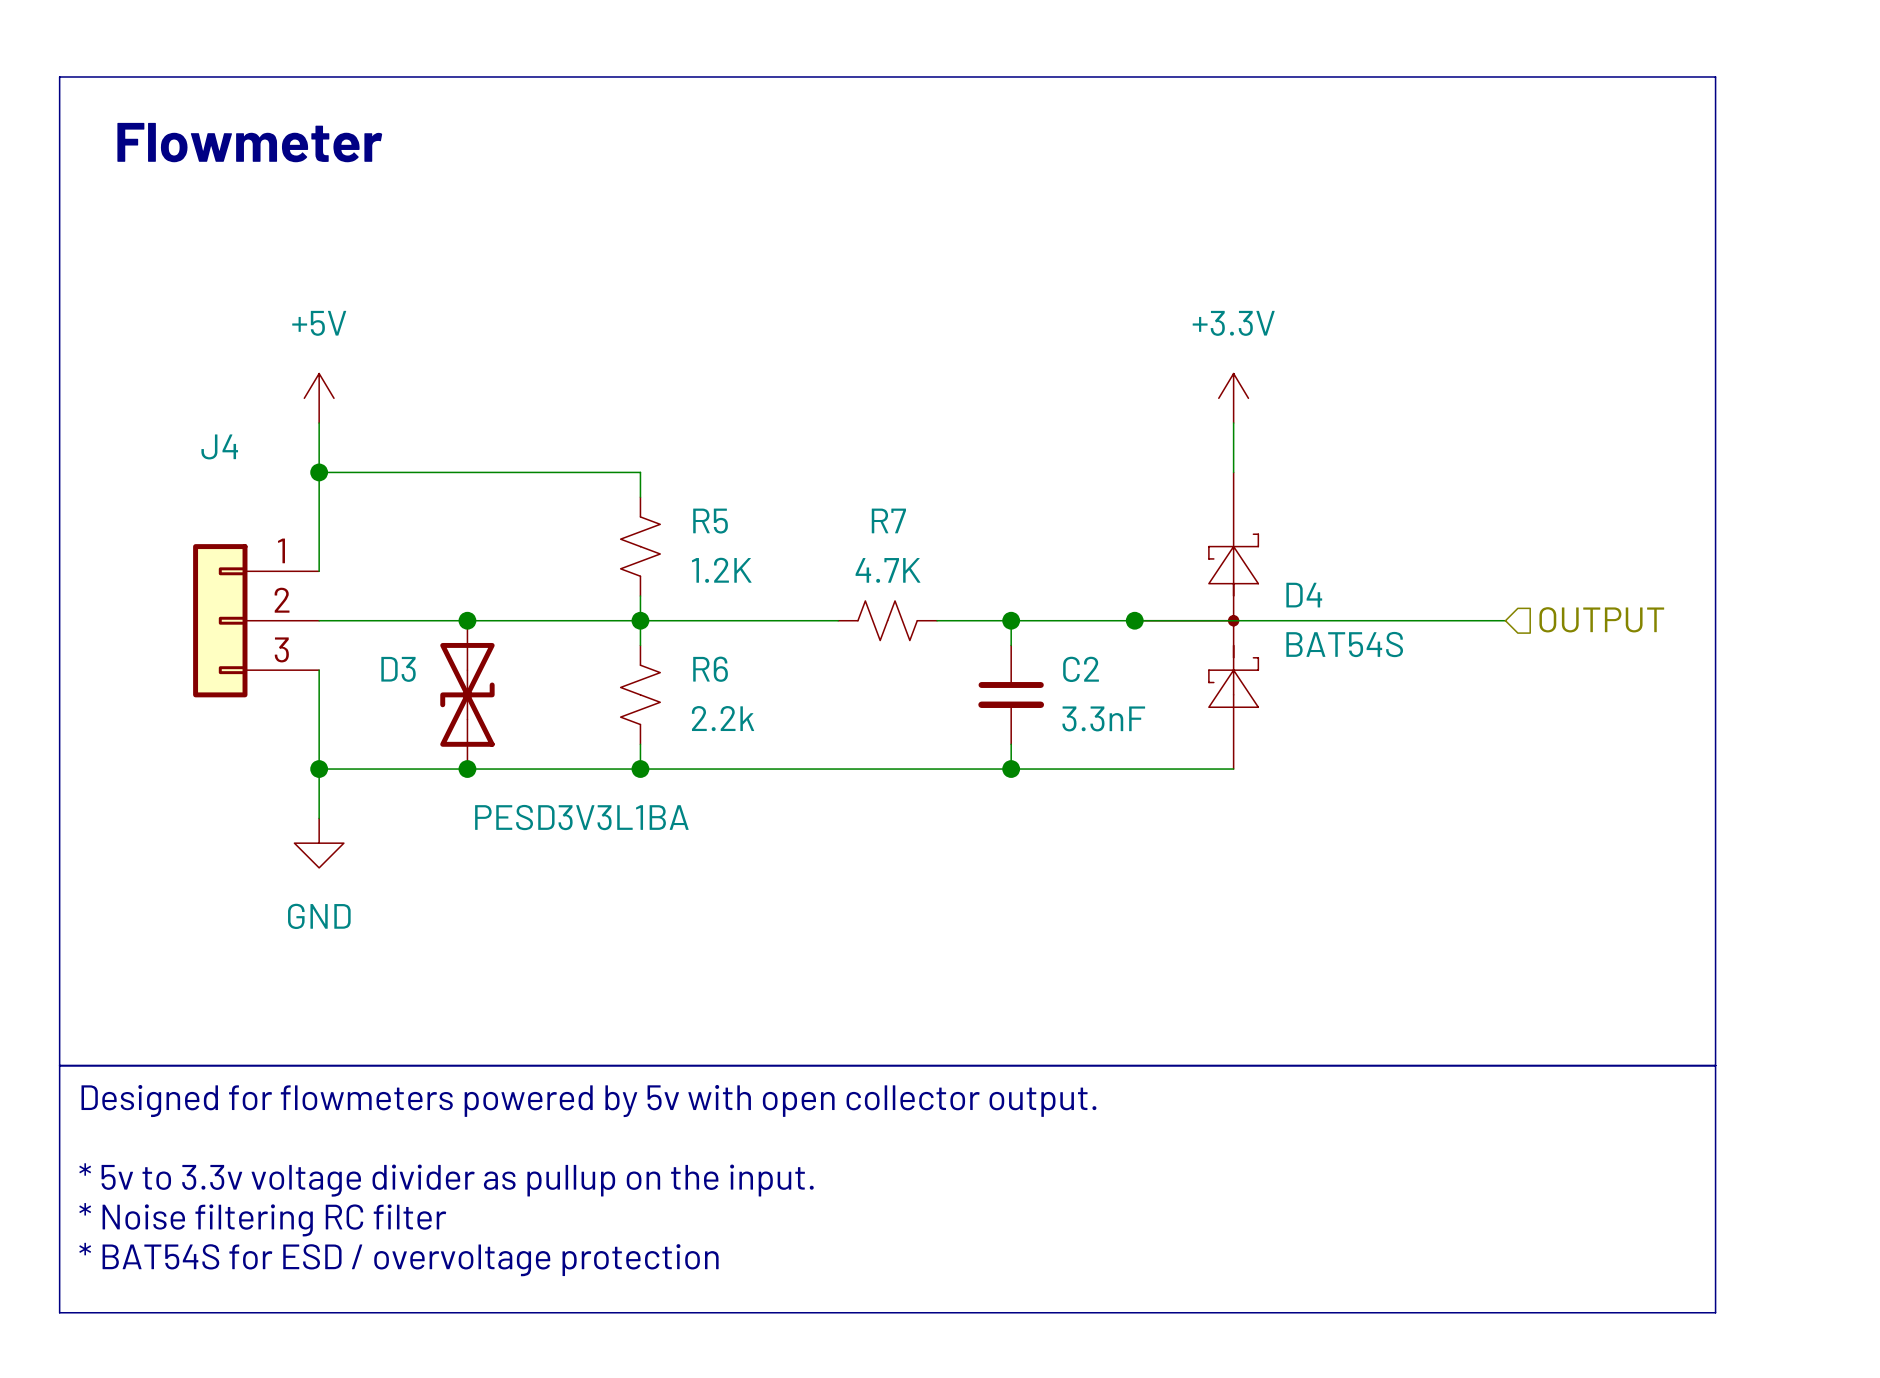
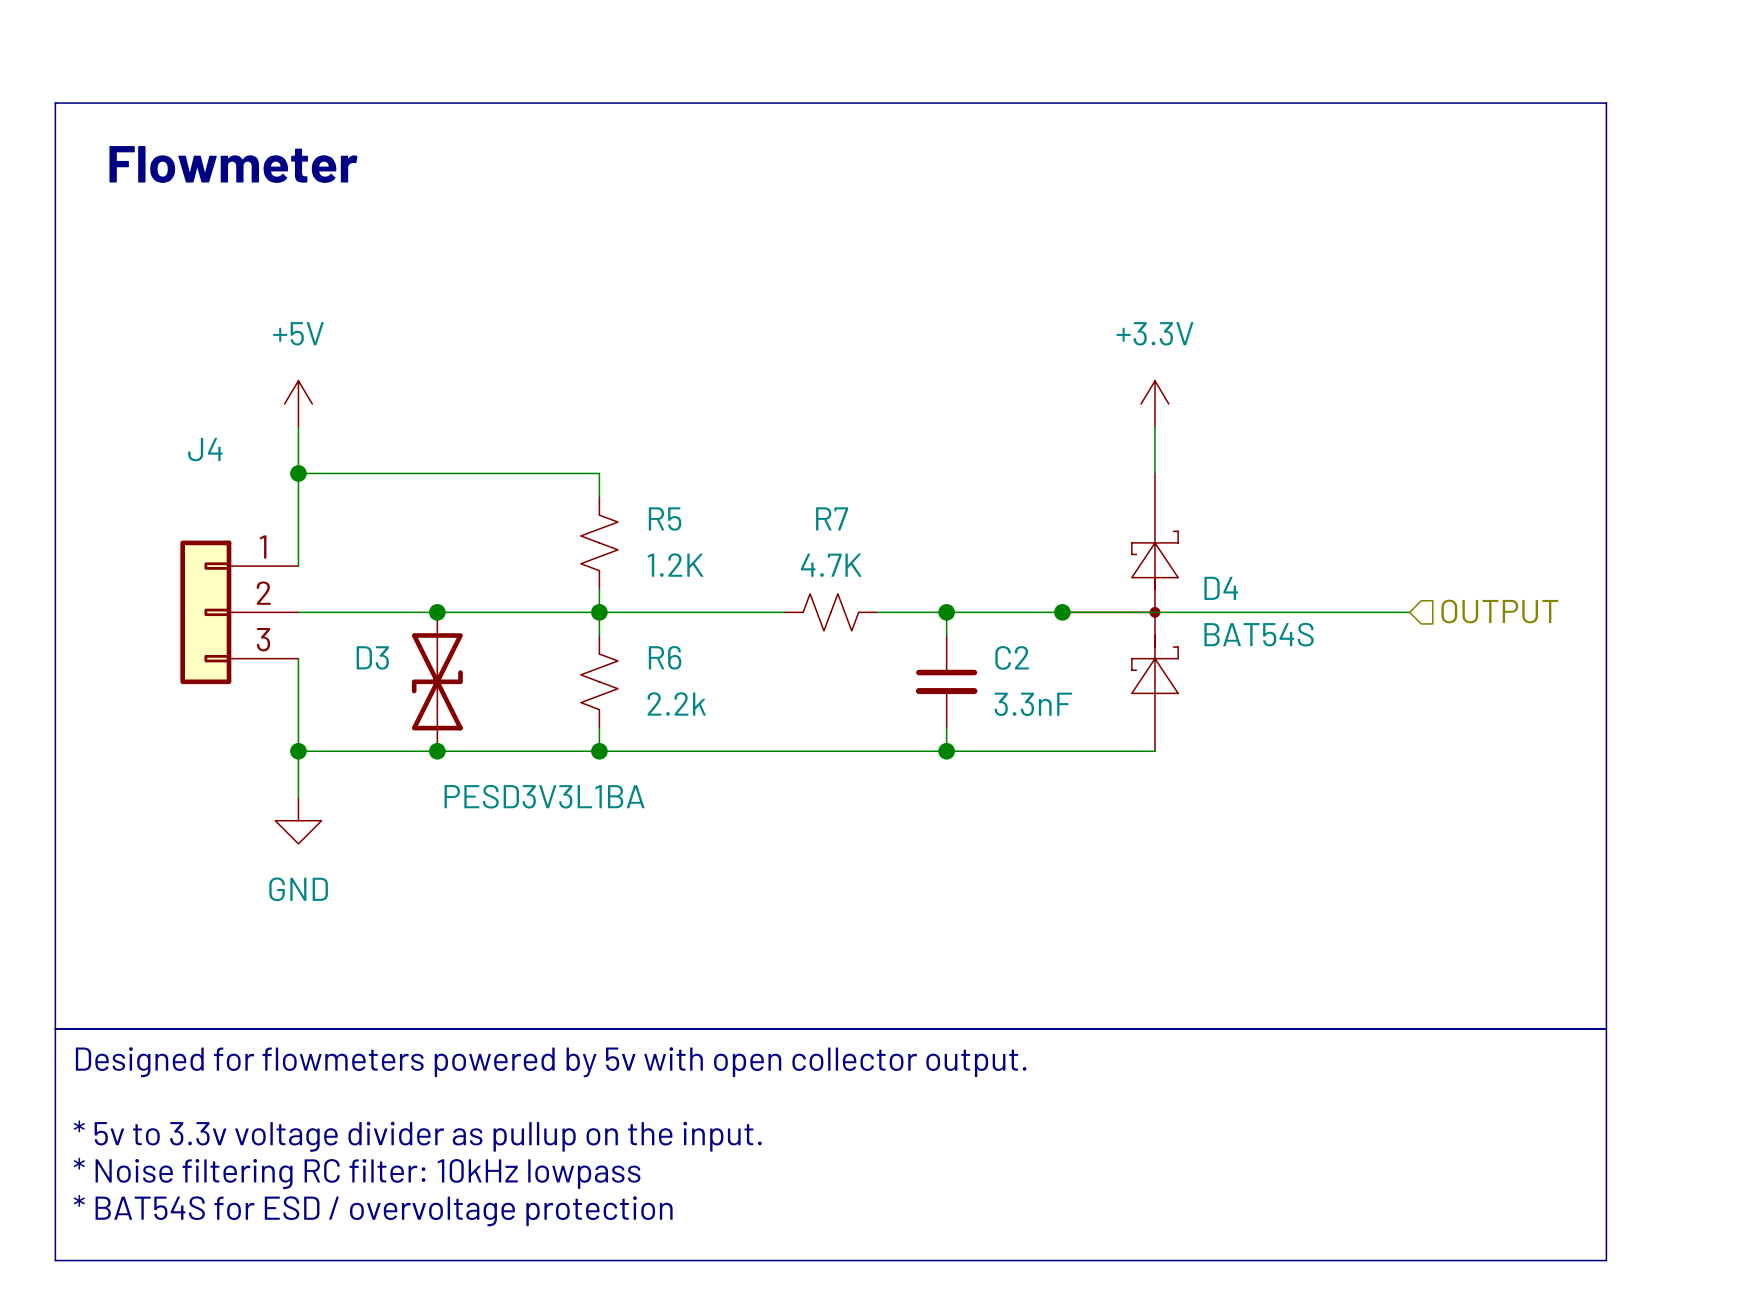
text: * Noise filtering RC filter (262, 1219) -> * Noise filtering RC filter: 10kHz lowpass (357, 1173)

